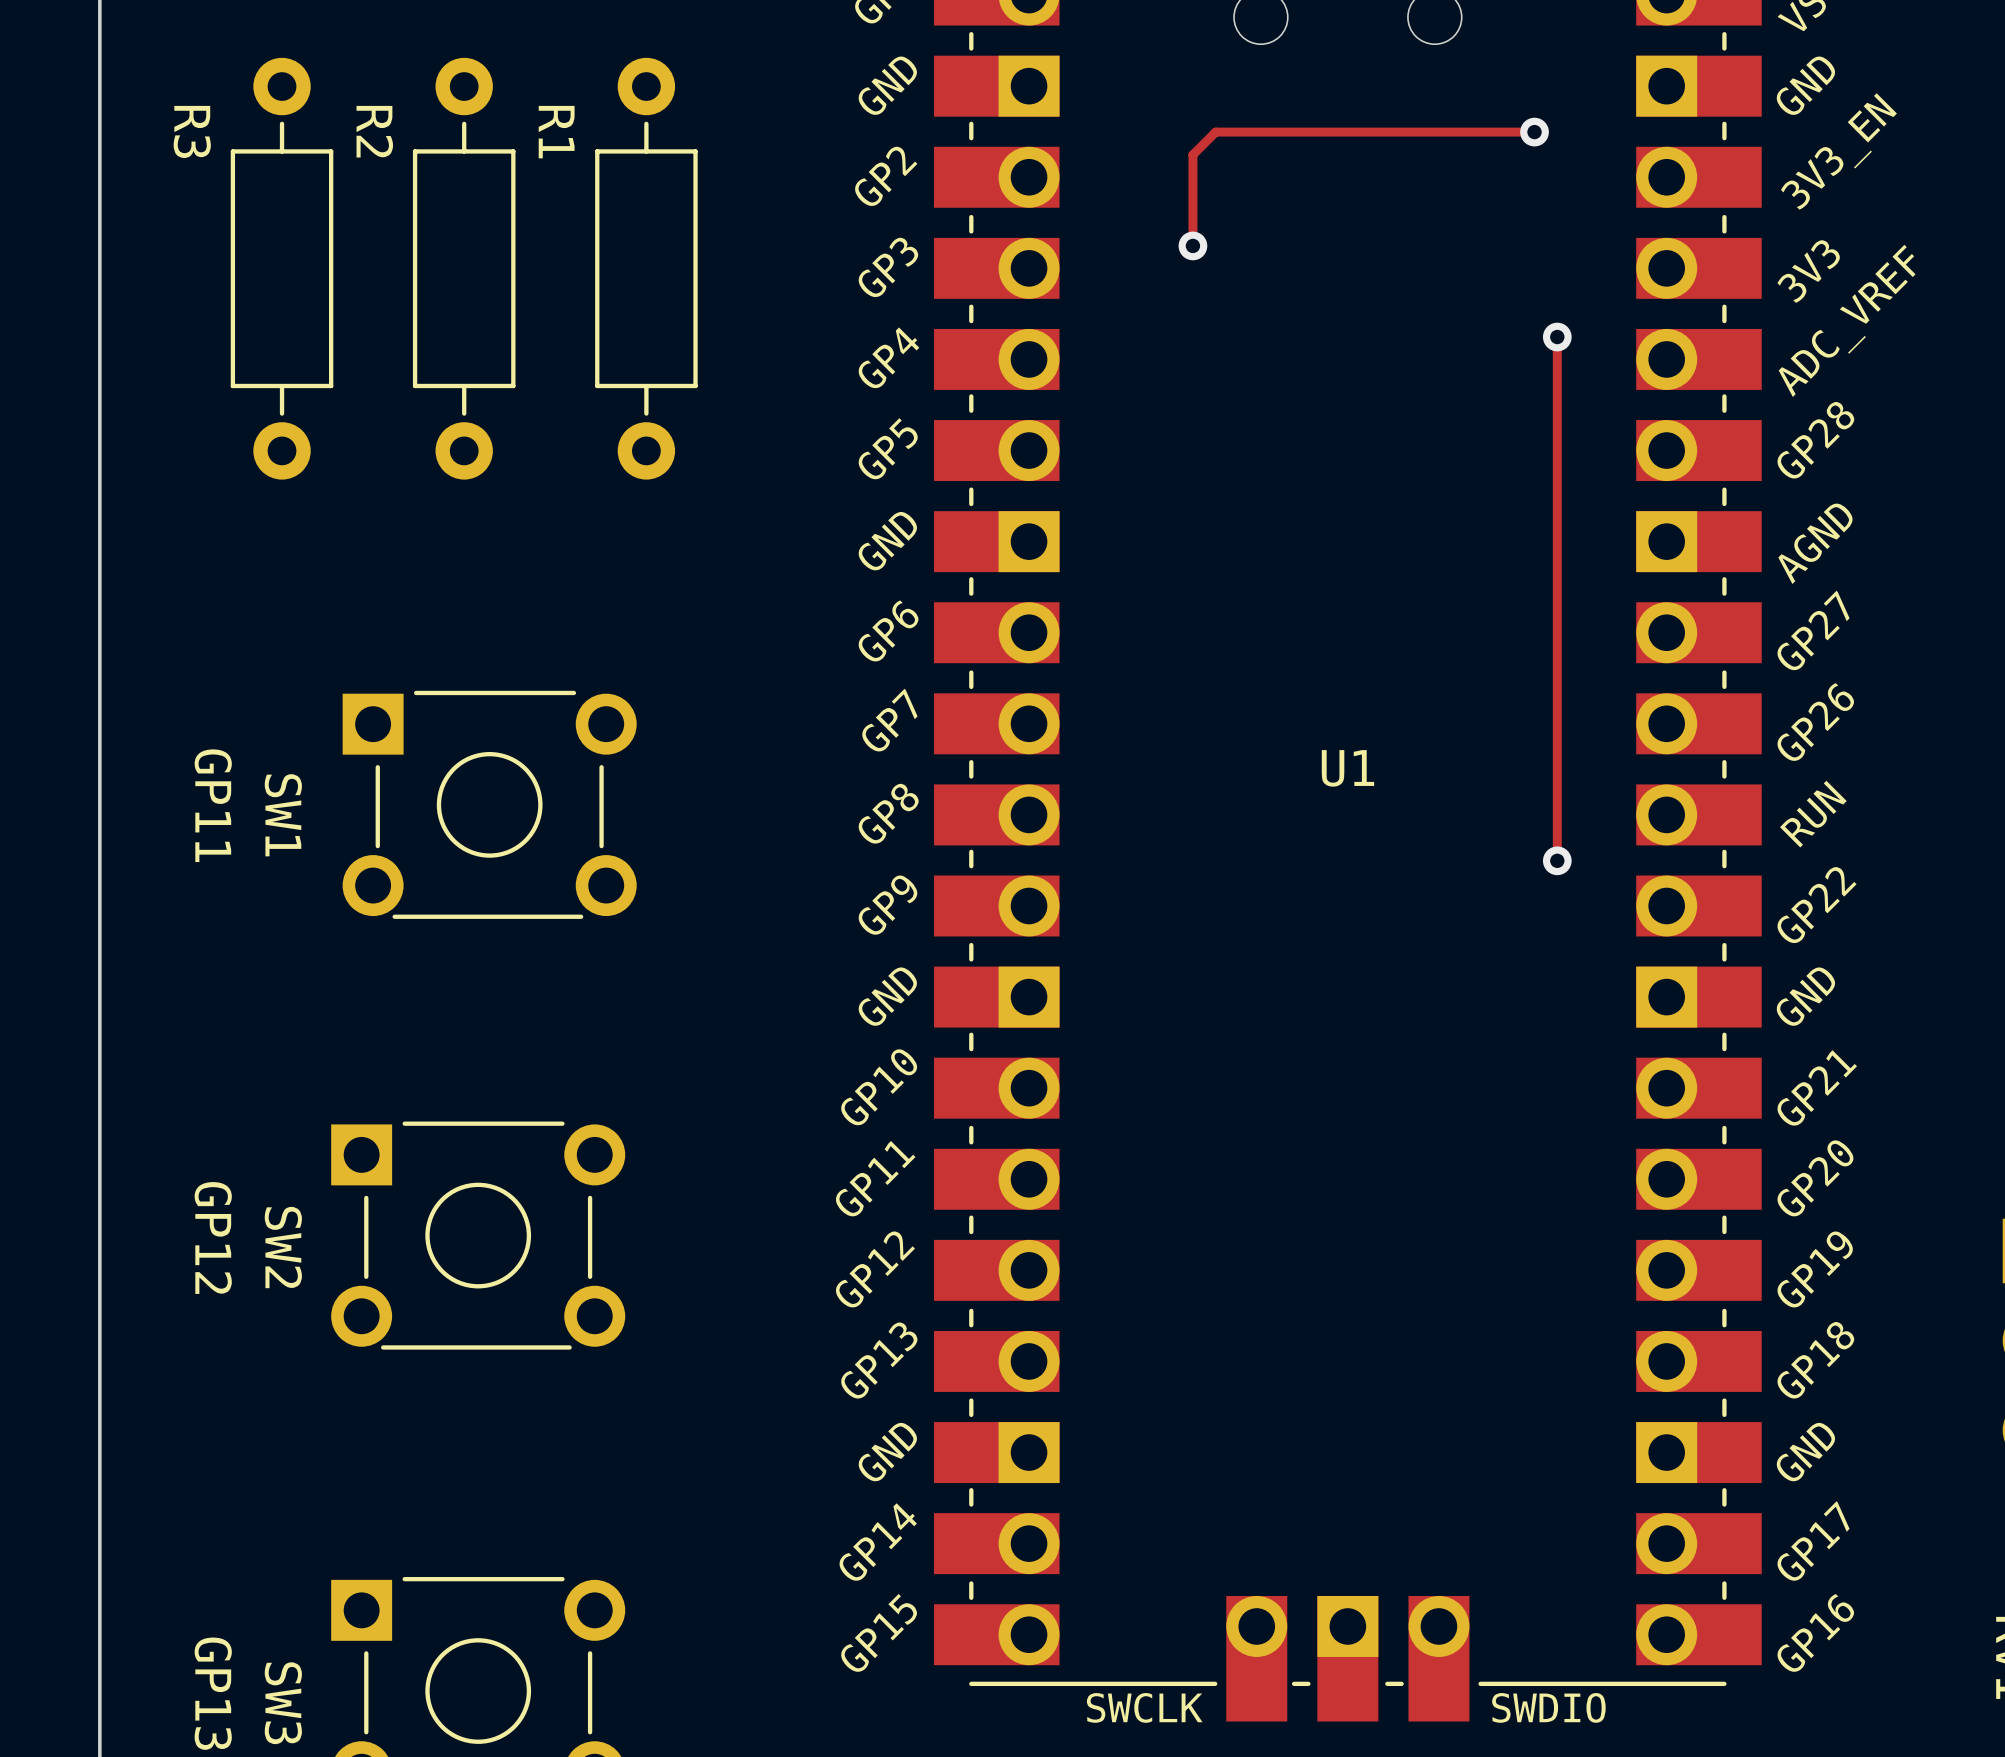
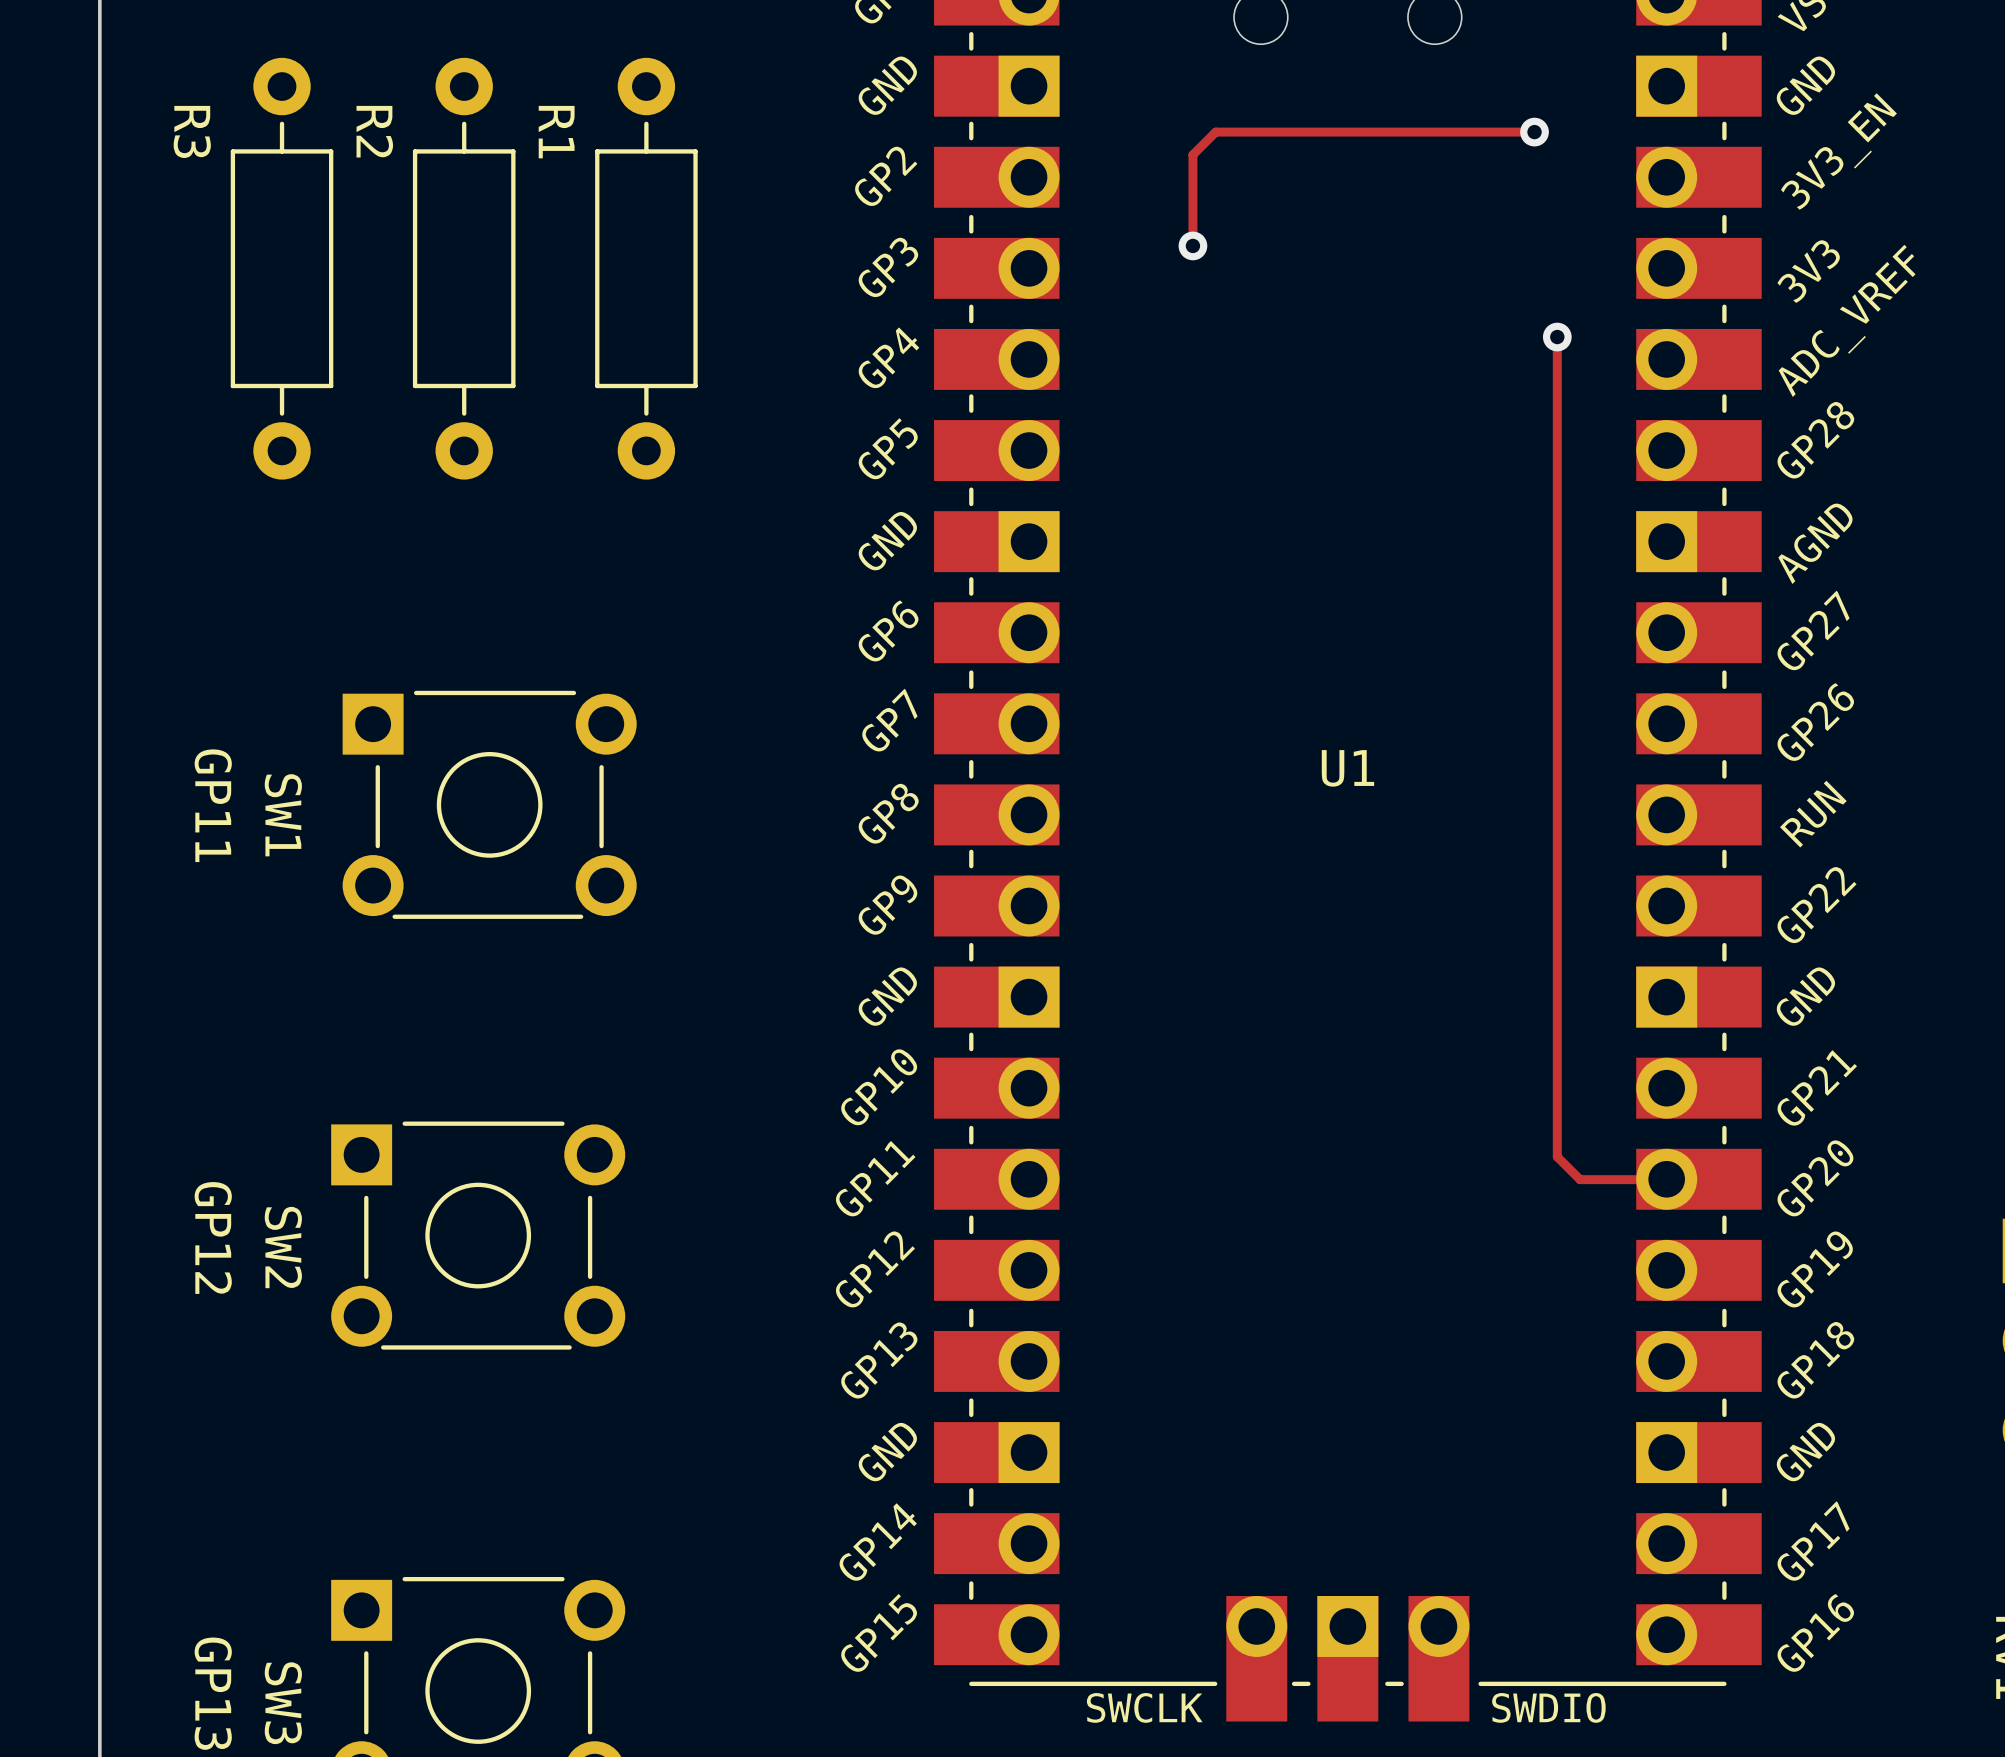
track: none -> (1557, 860) (1557, 1156) (1580, 1179) (1666, 1179)
via: (1557, 860) -> none

